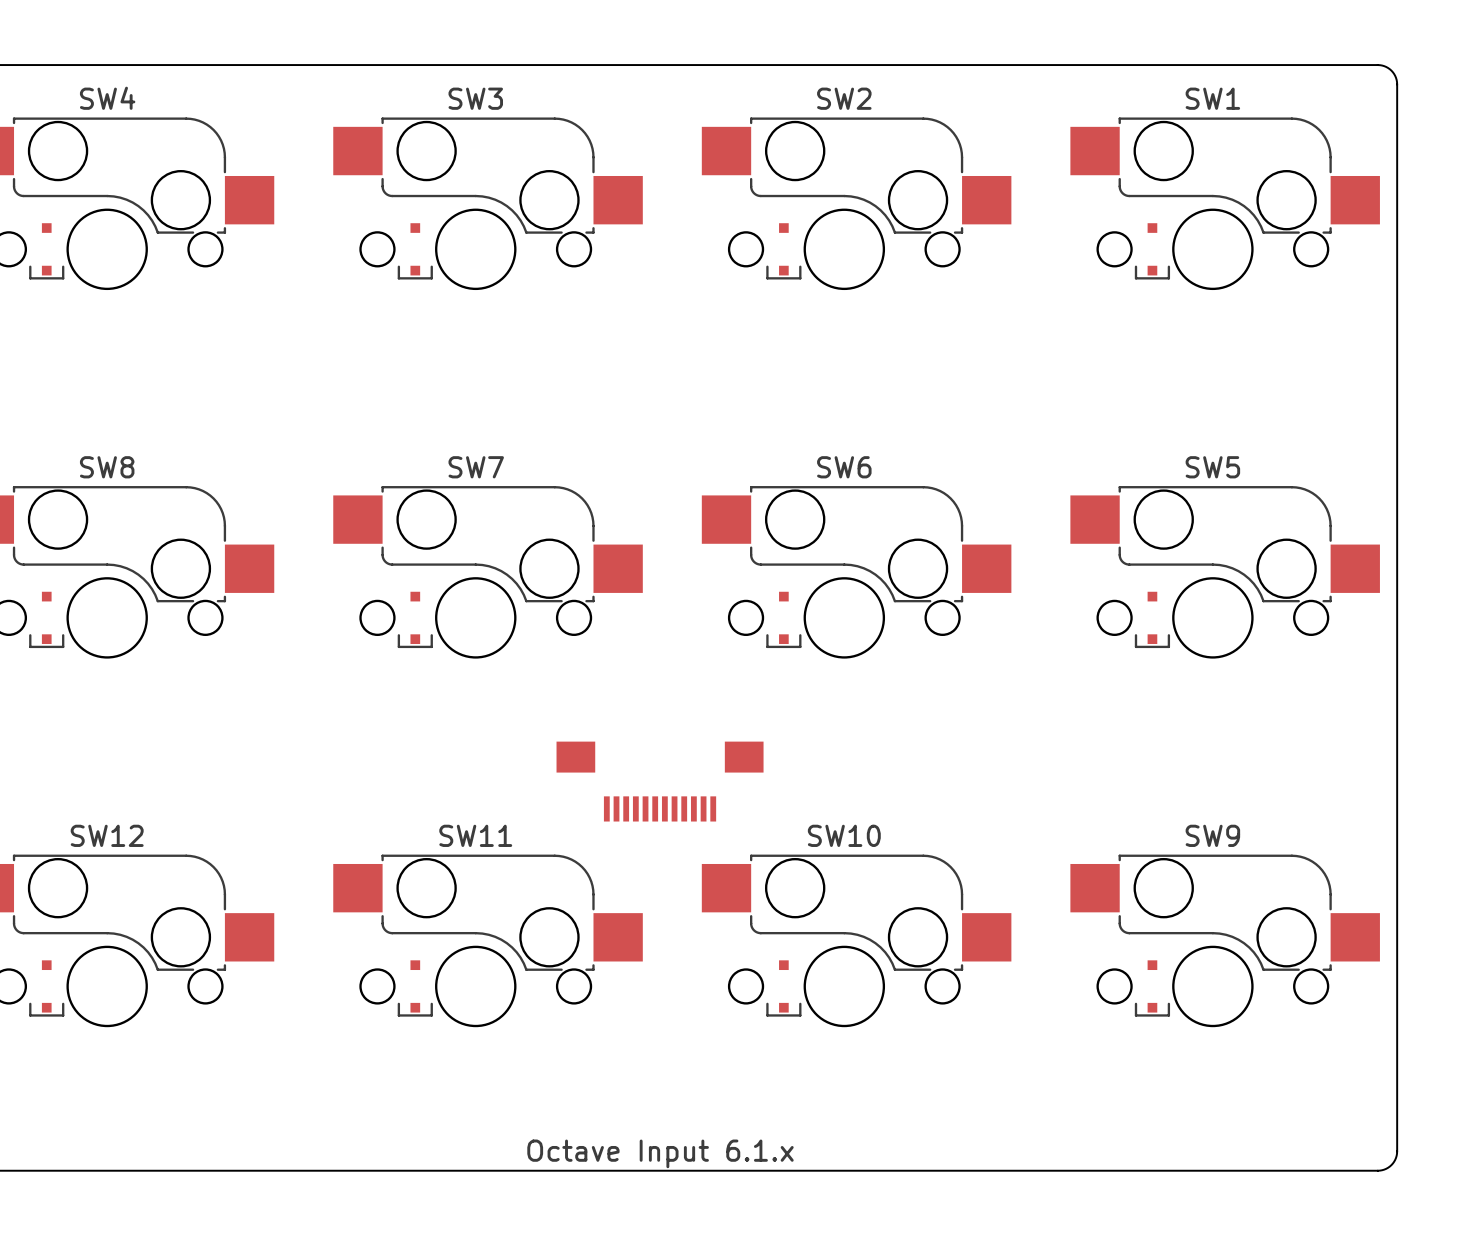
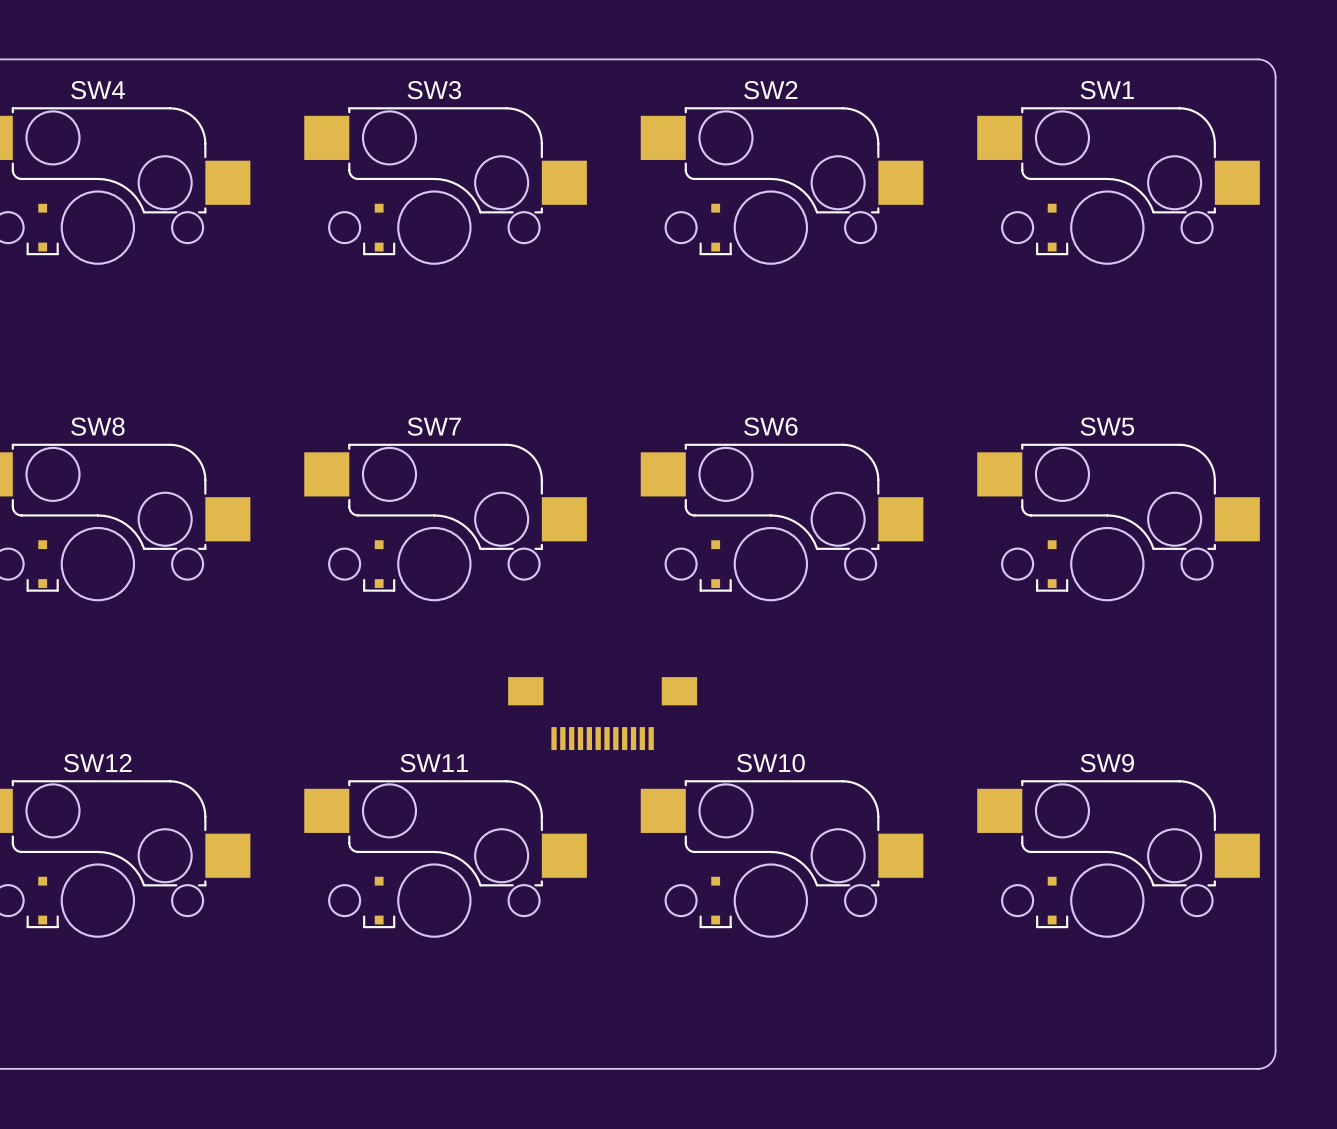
text: Octave Input 6.1.x (660, 1153) -> none

